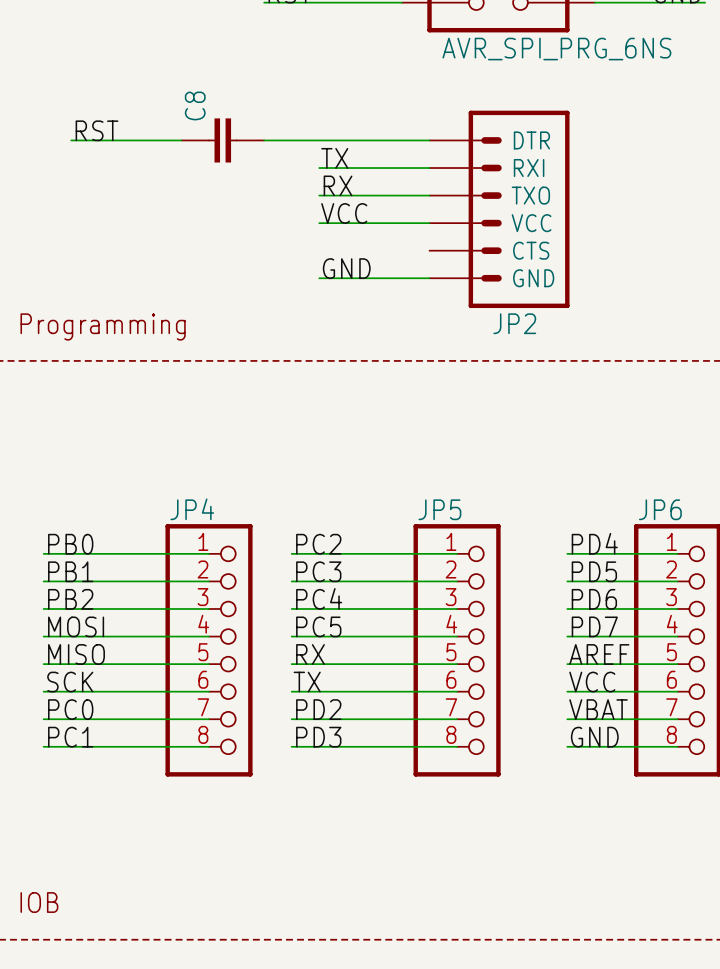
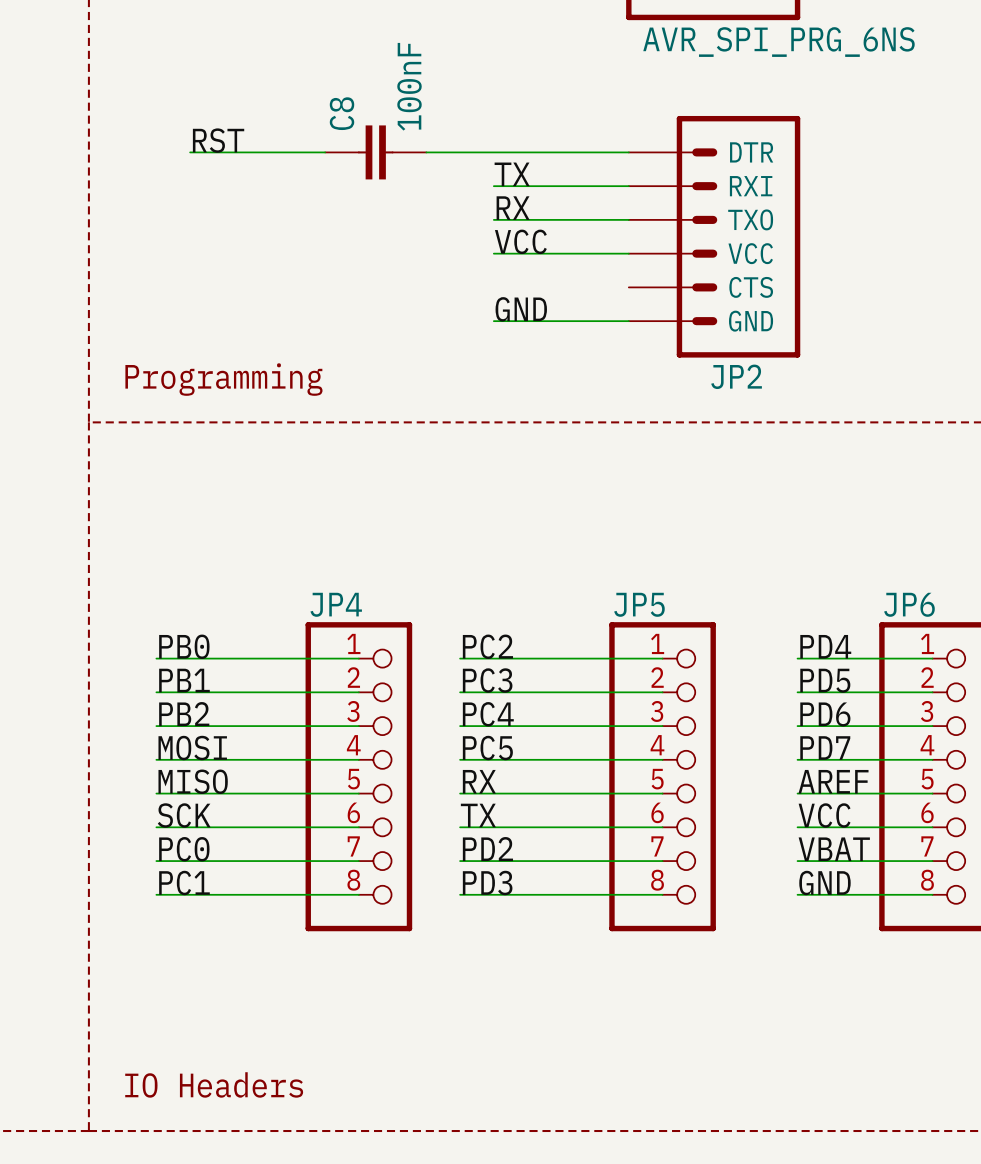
C8 value: none -> 100nF (409, 86)
text: IOB (39, 902) -> IO Headers (214, 1084)

